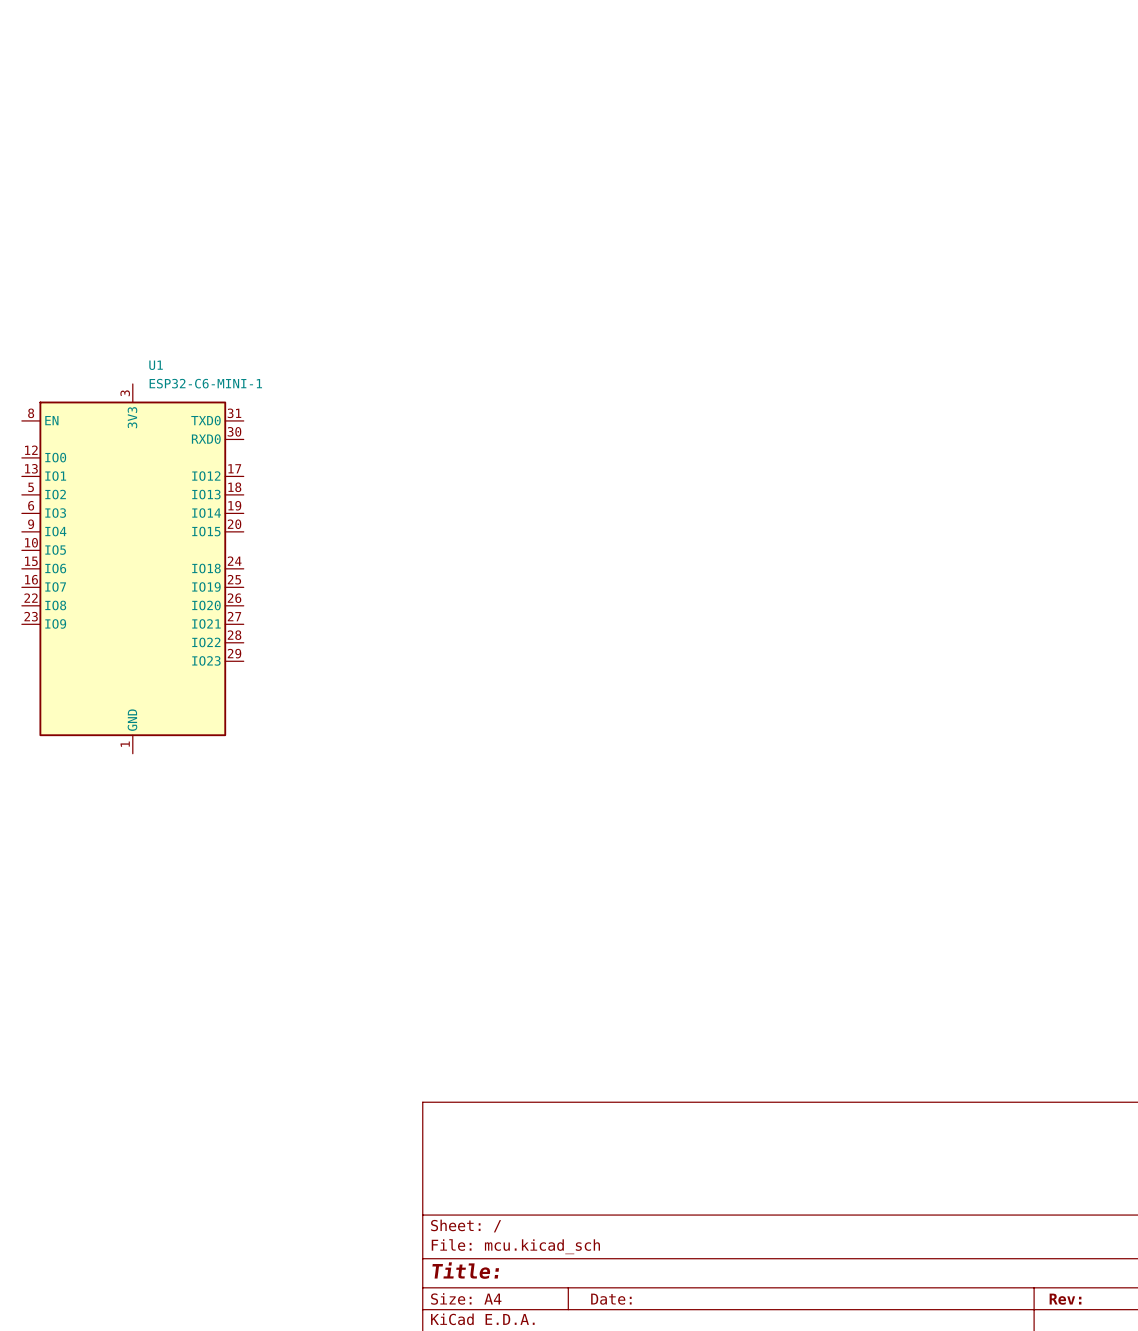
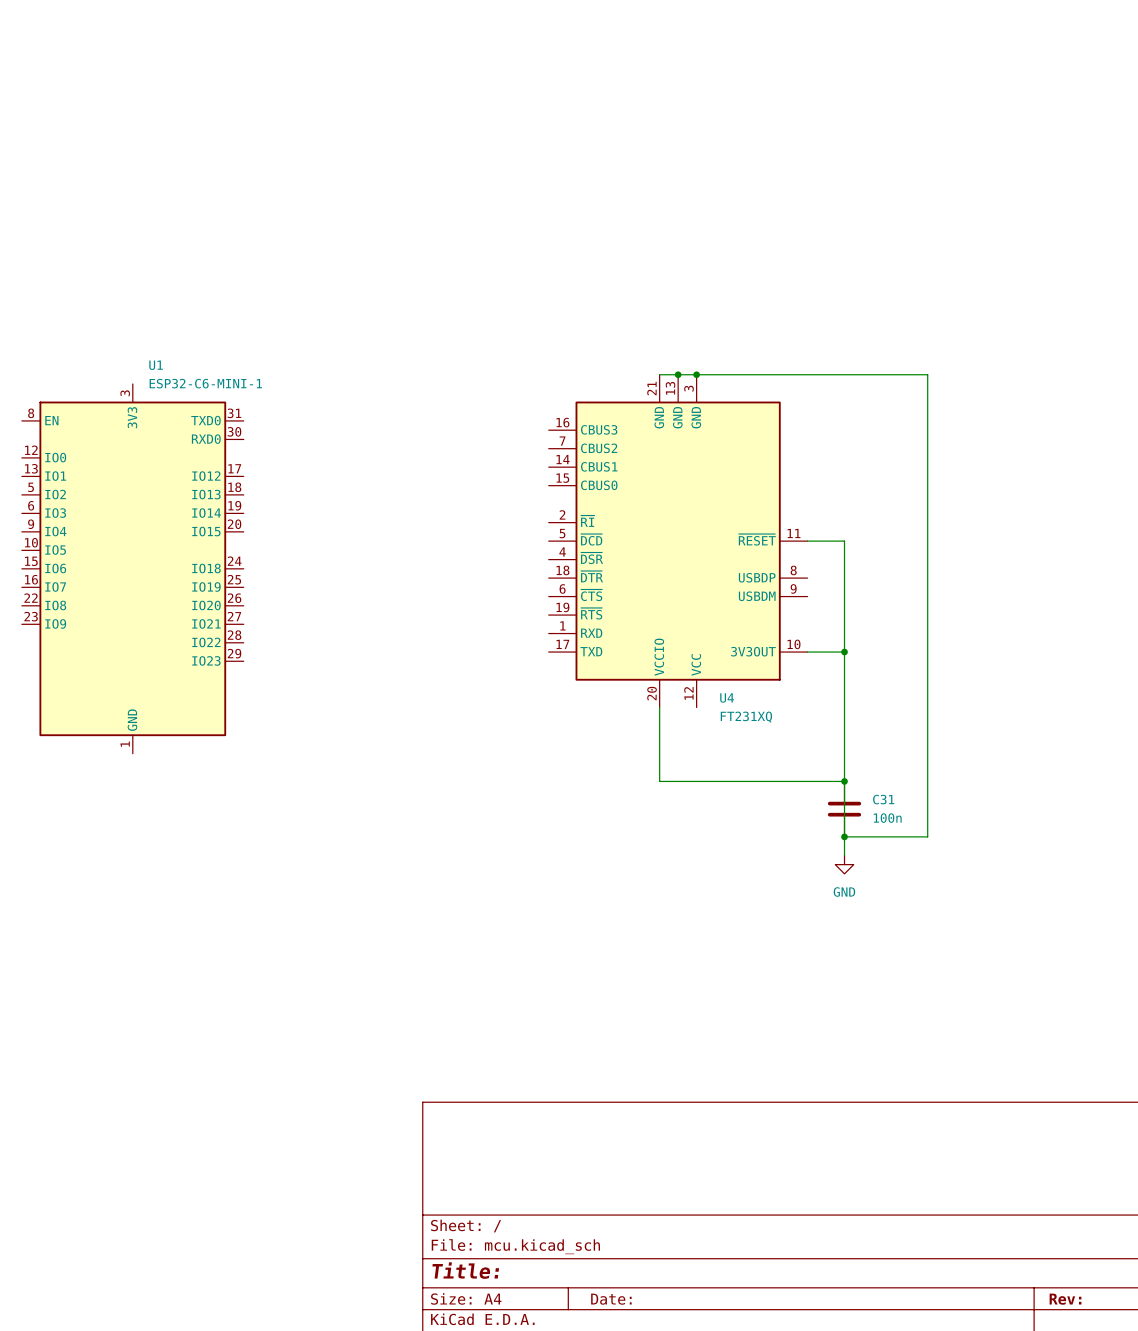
wire: none -> (659, 374) (927, 374) (927, 836) (844, 836)
junction: none -> (678, 374)
junction: none -> (696, 374)
U4: none -> FT231XQ (678, 541)
wire: none -> (807, 541) (844, 541) (844, 855)
wire: none -> (807, 652) (844, 652)
junction: none -> (844, 652)
wire: none -> (659, 707) (659, 781) (844, 781)
junction: none -> (844, 781)
C31: none -> 100n (844, 809)
junction: none -> (844, 836)
power symbol: none -> GND (844, 864)

